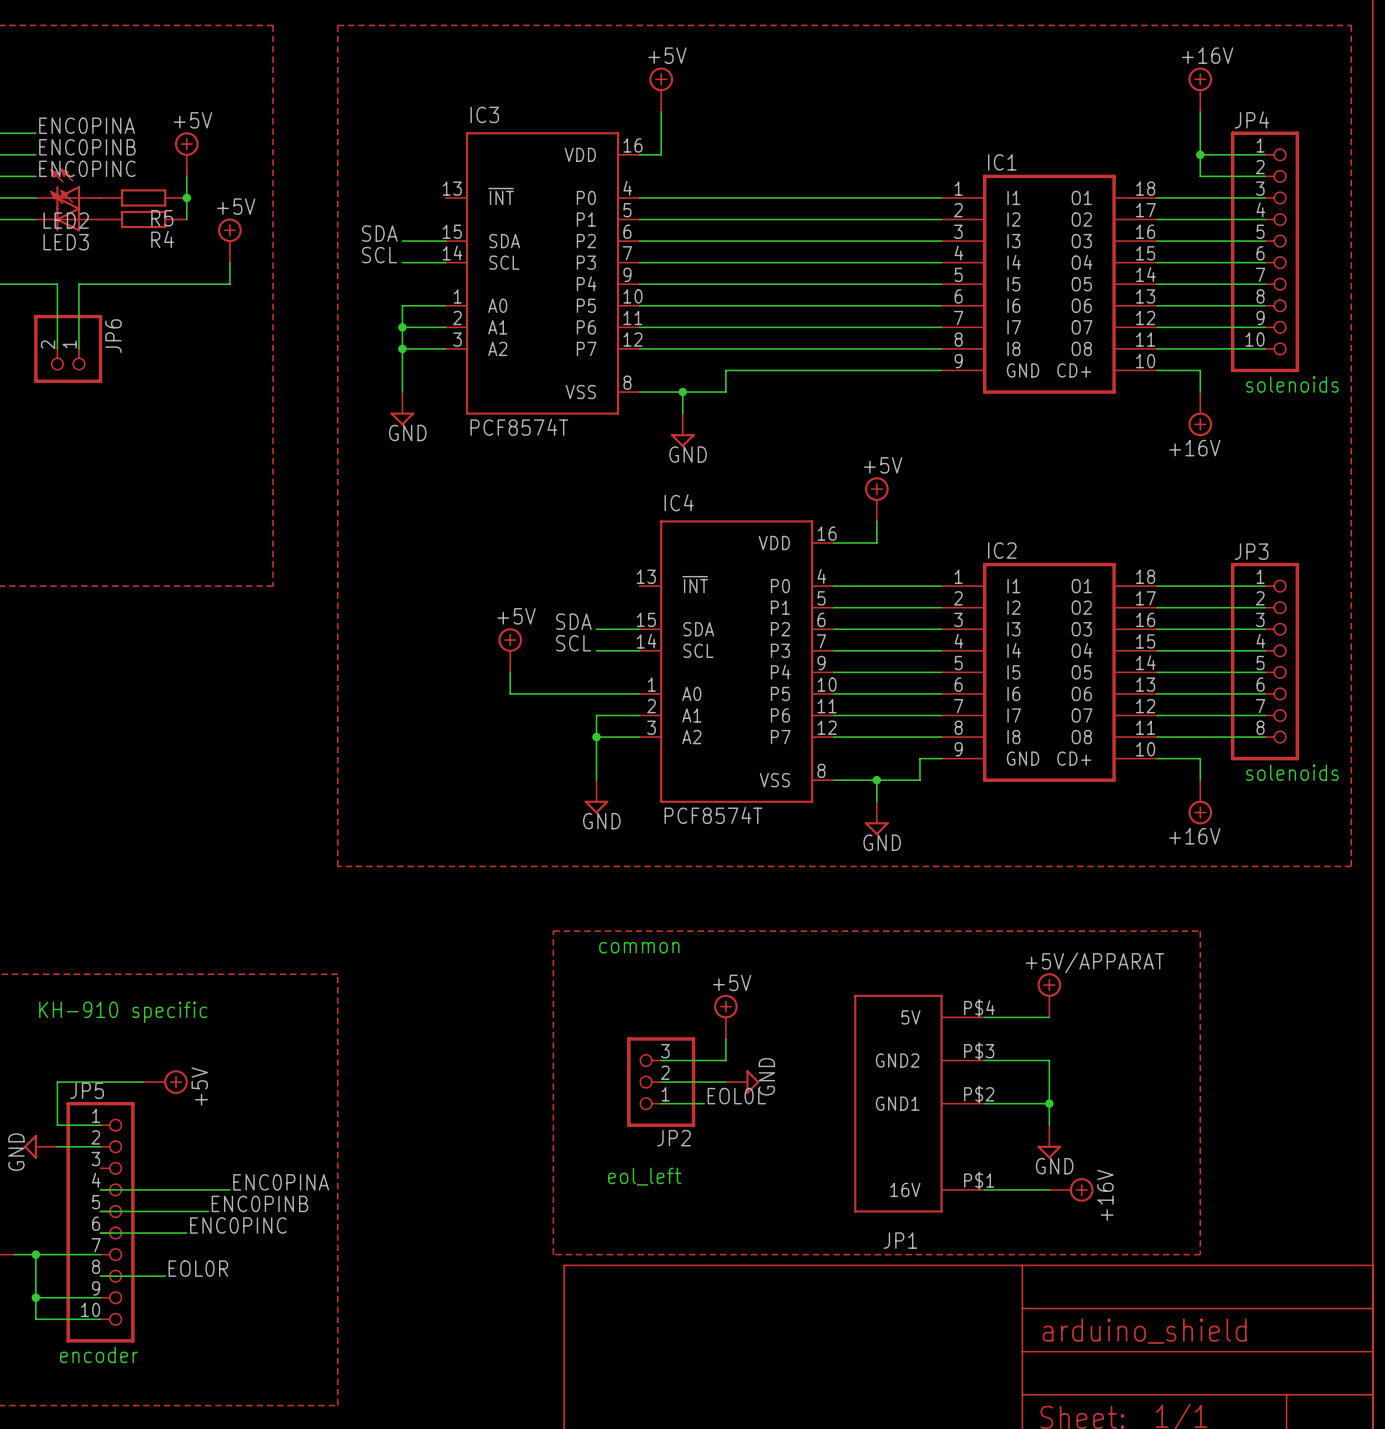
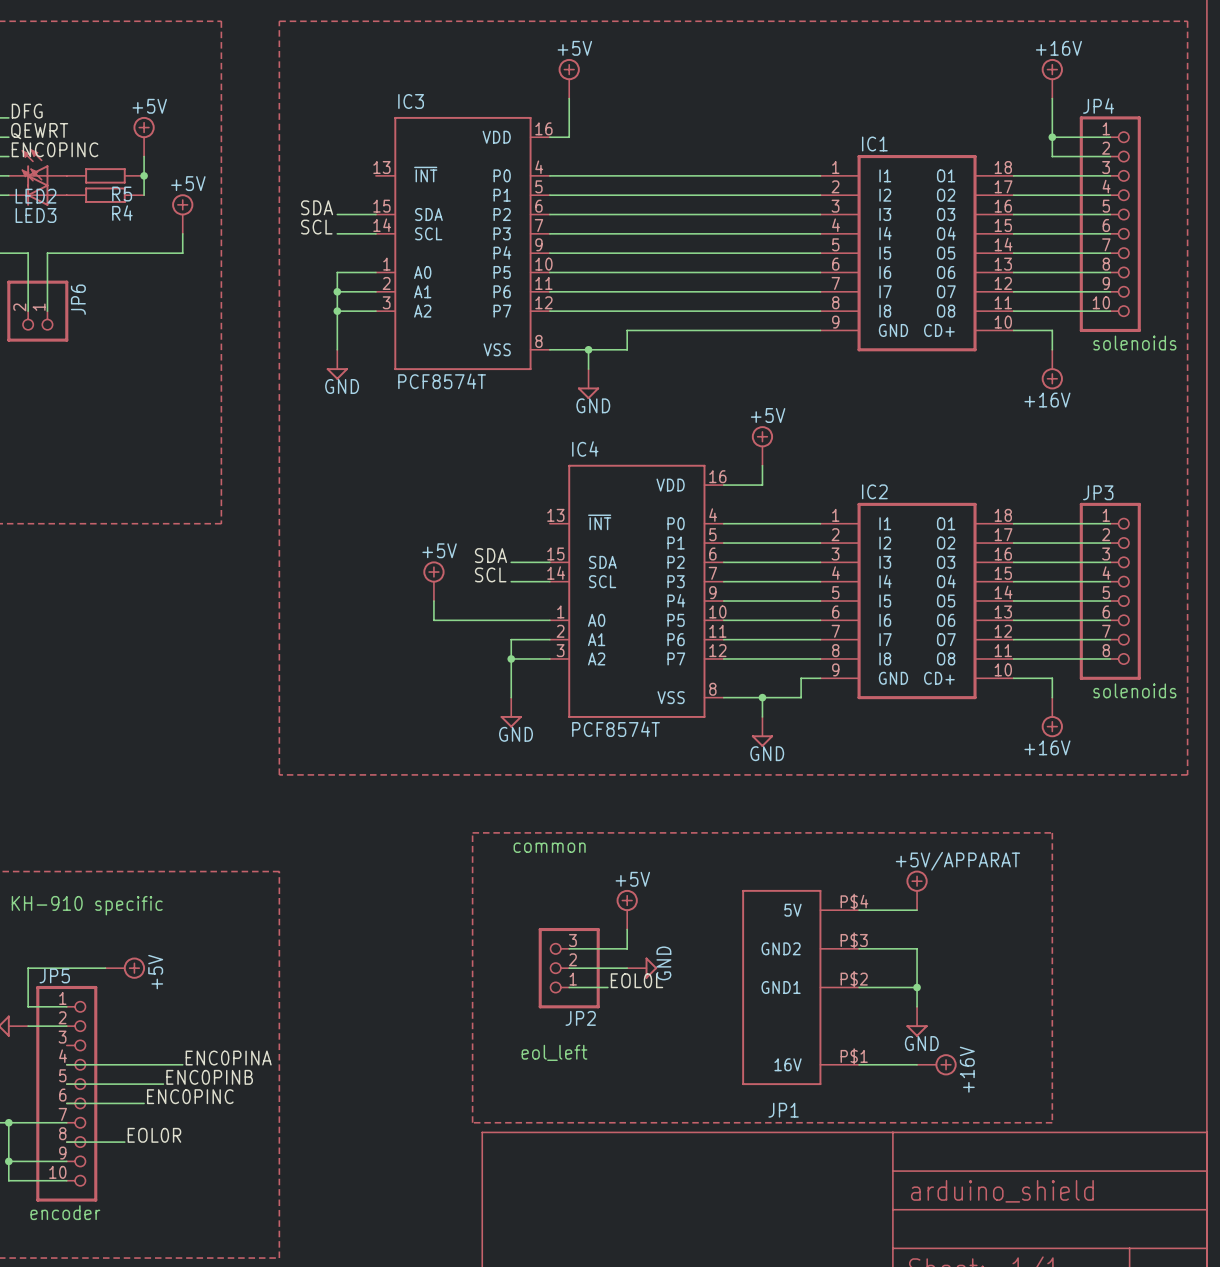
label: ENC0PINA (87, 125) -> DFG (27, 111)
label: ENC0PINB (87, 147) -> QEWRT (39, 131)

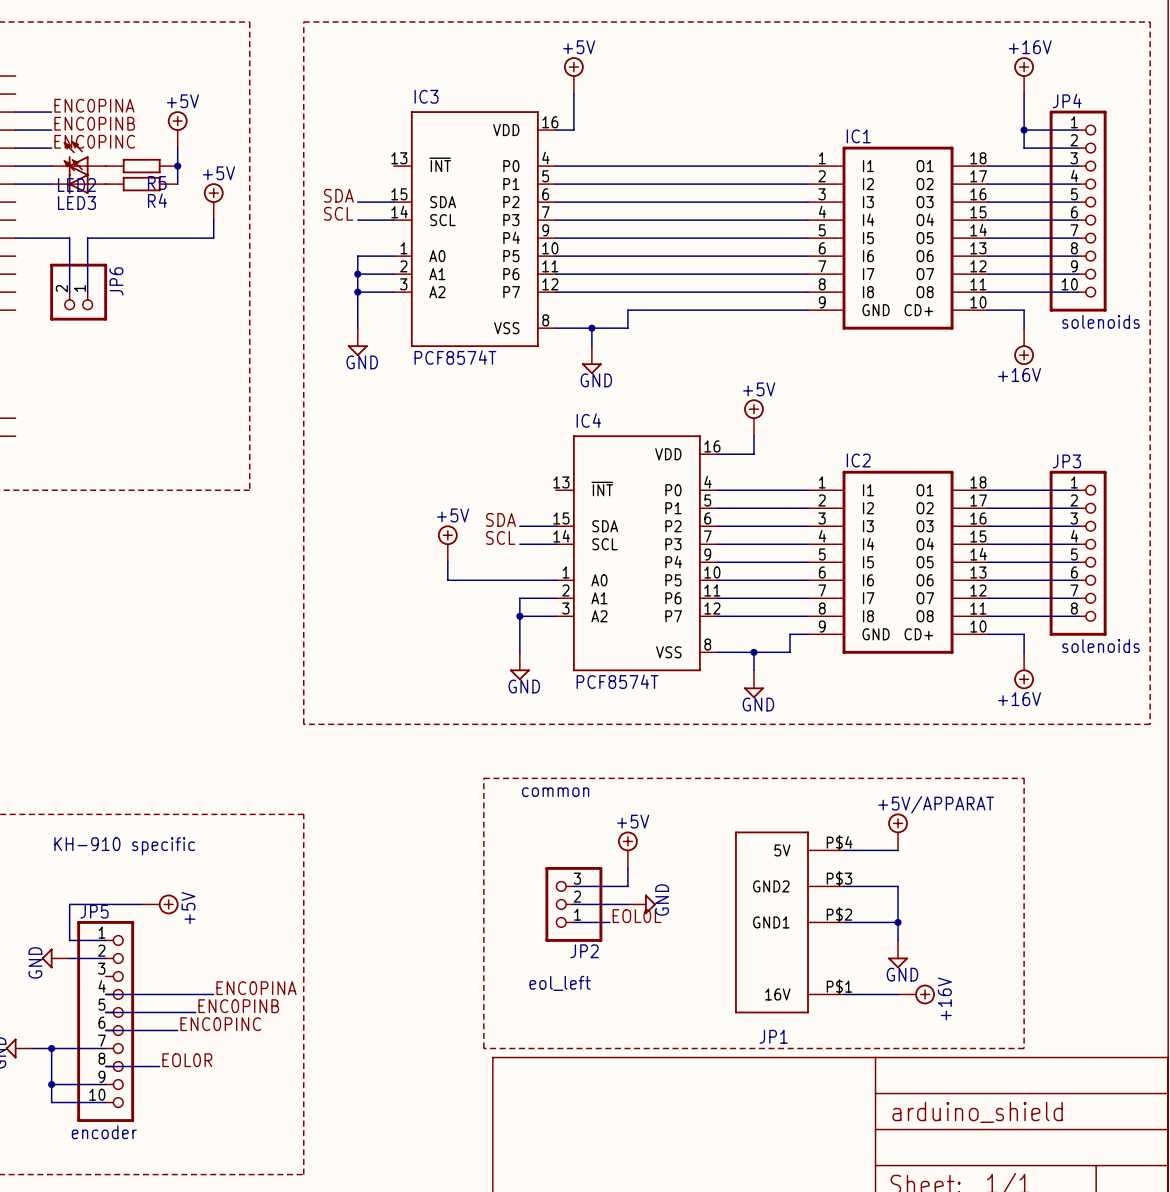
label: DFG (27, 111) -> ENC0PINA (94, 105)
label: QEWRT (39, 131) -> ENC0PINB (94, 123)

